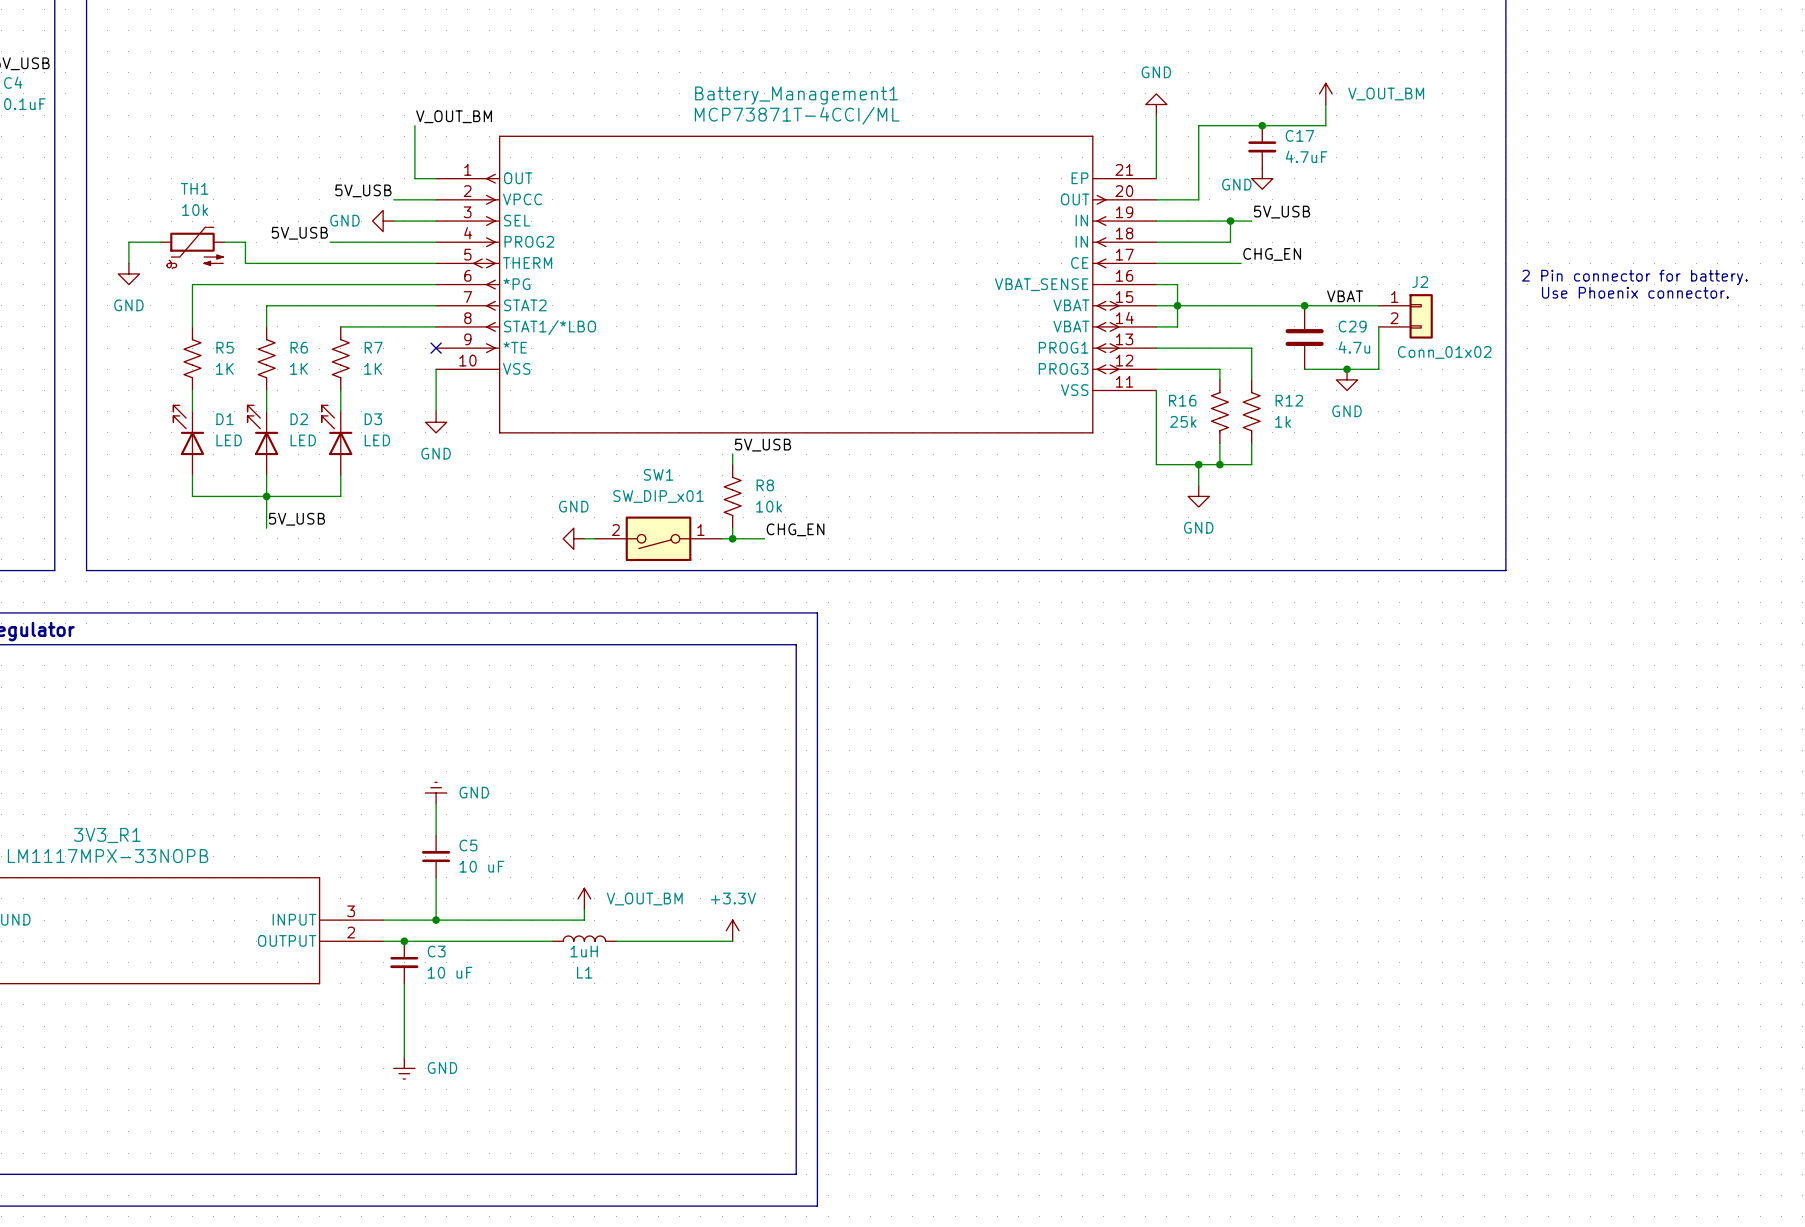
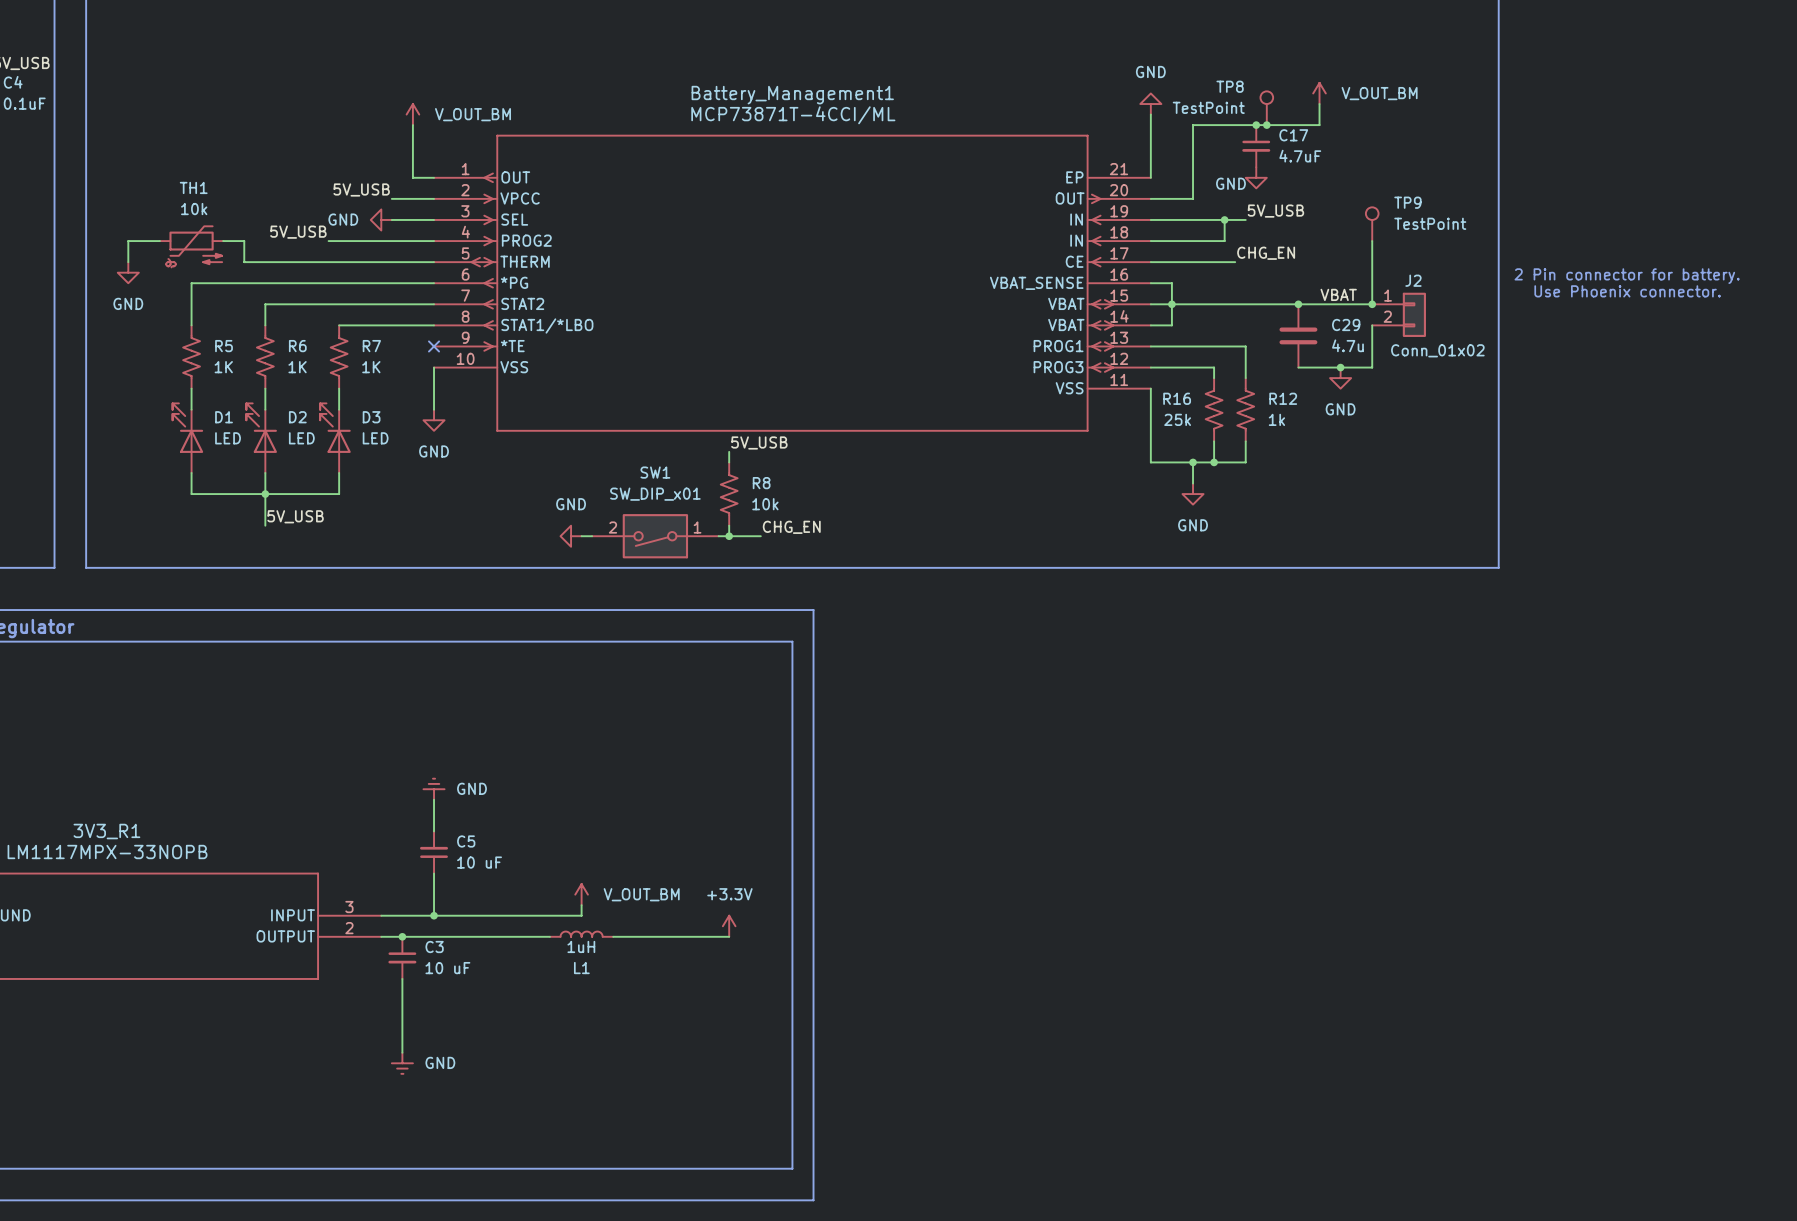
TP8: none -> TestPoint (1266, 108)
power symbol: none -> V_OUT_BM (412, 114)
label: V_OUT_BM (454, 116) -> none
junction: none -> (1266, 125)
TP9: none -> TestPoint (1372, 224)
wire: none -> (1372, 241) (1372, 304)
junction: none -> (1372, 304)

